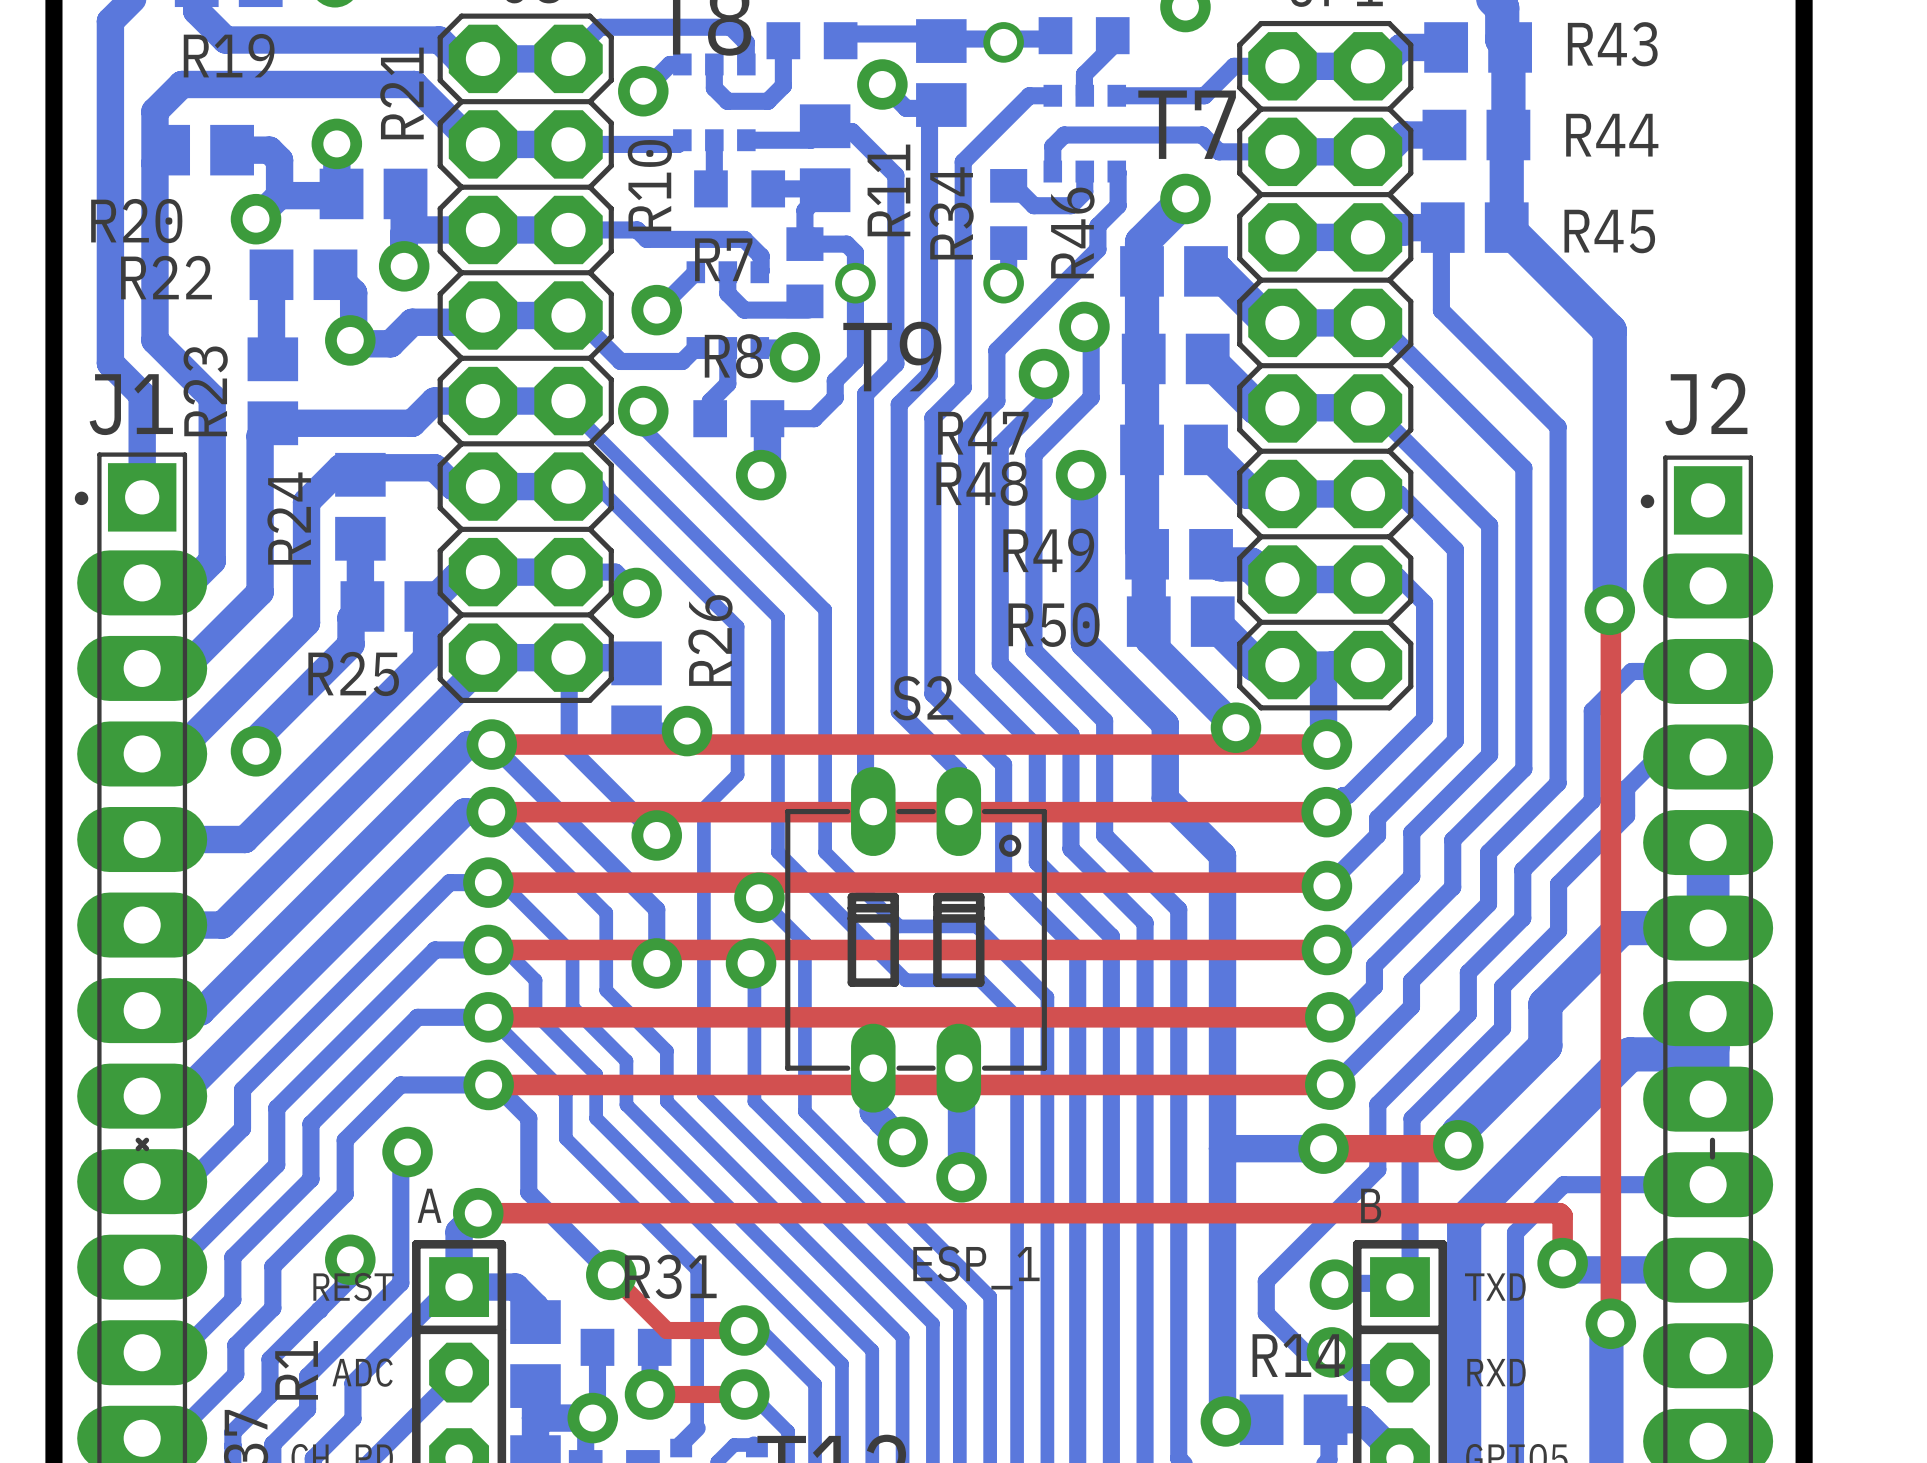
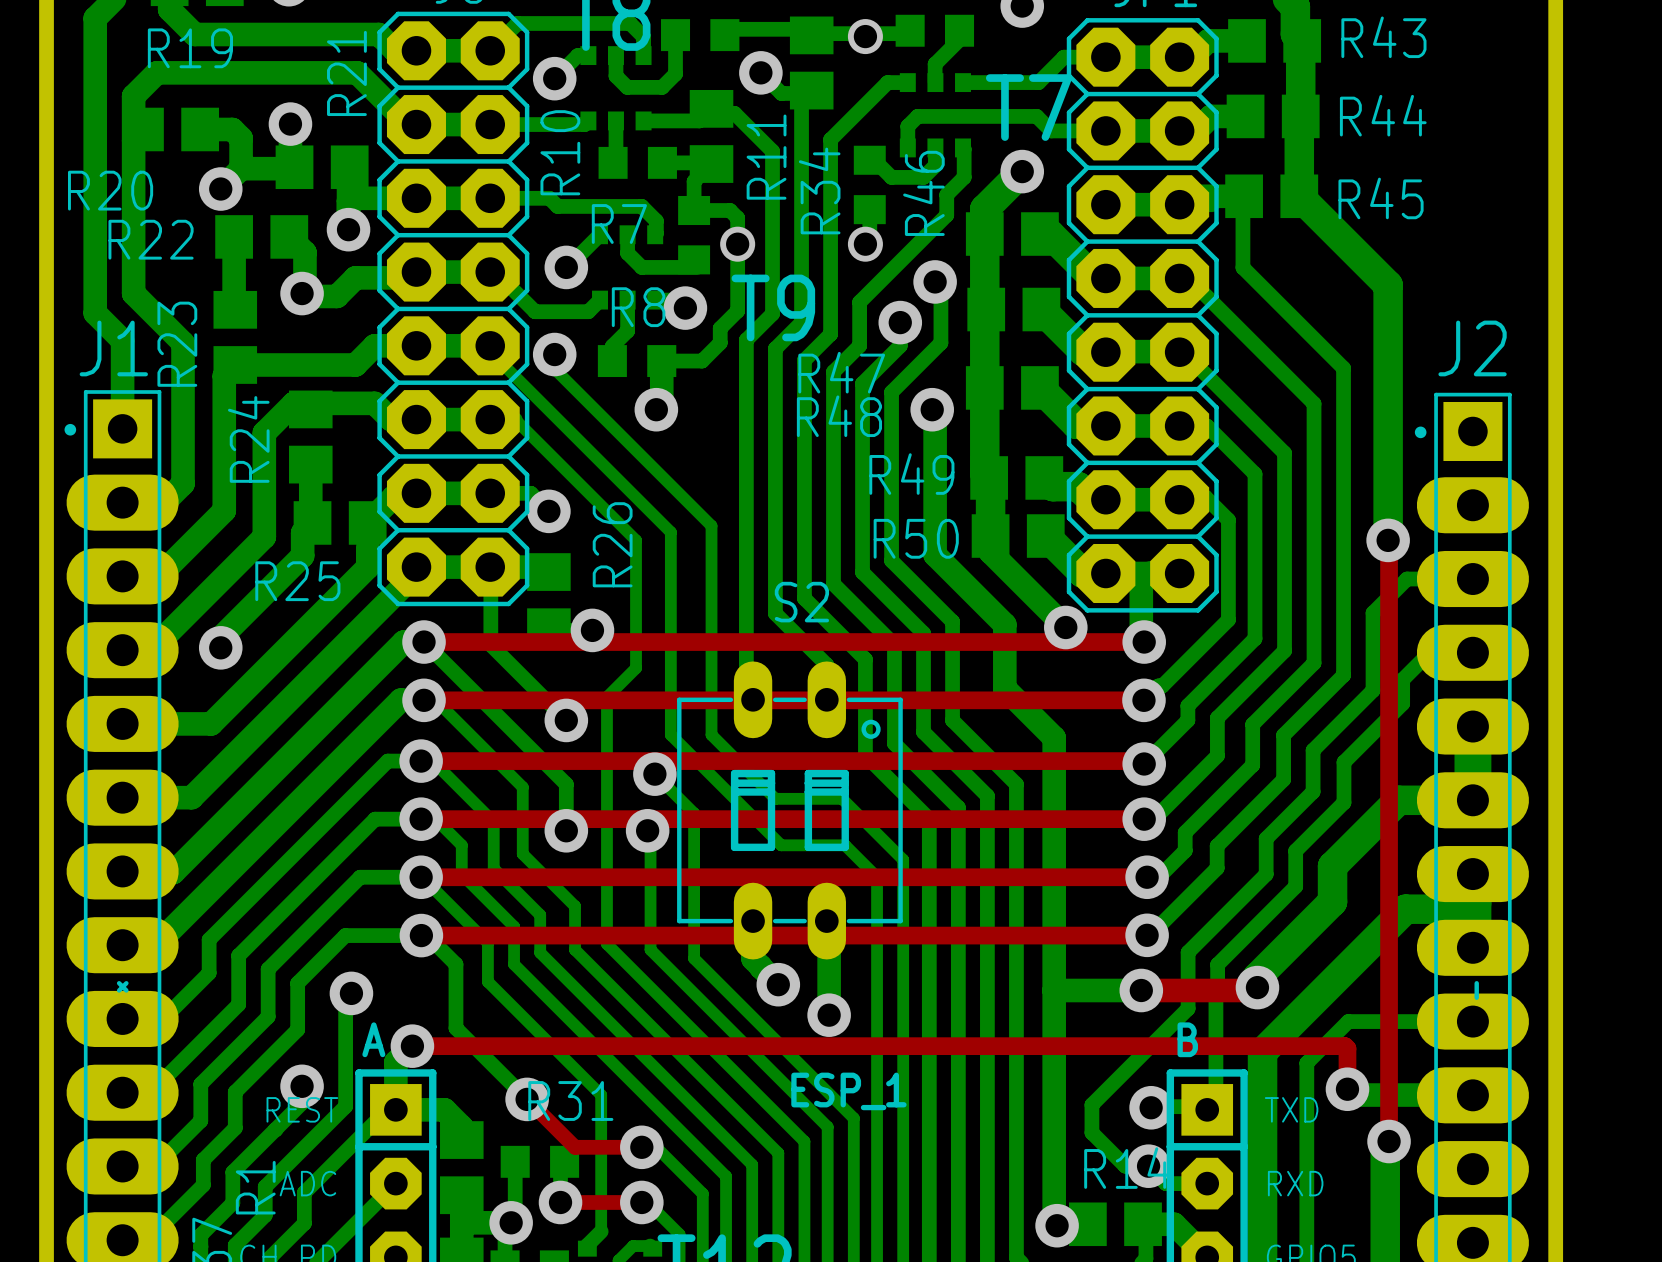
via position: (1609, 609) -> (1388, 540)

